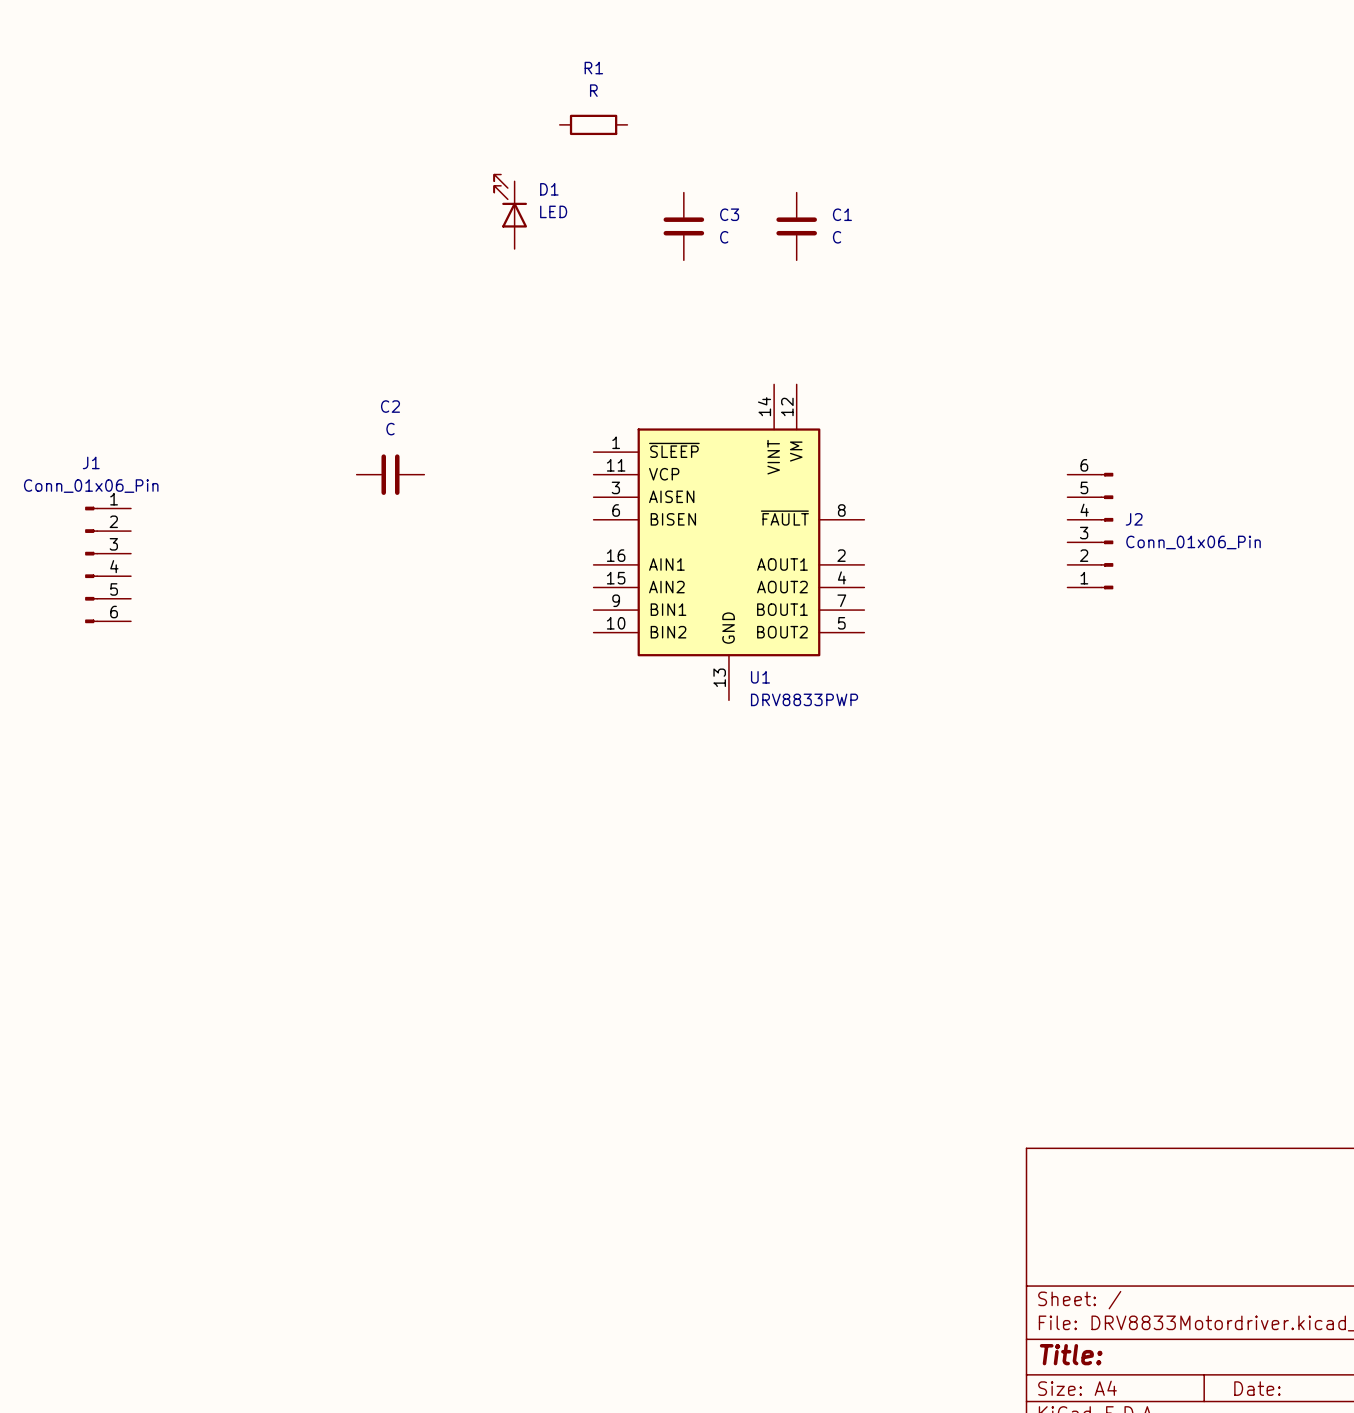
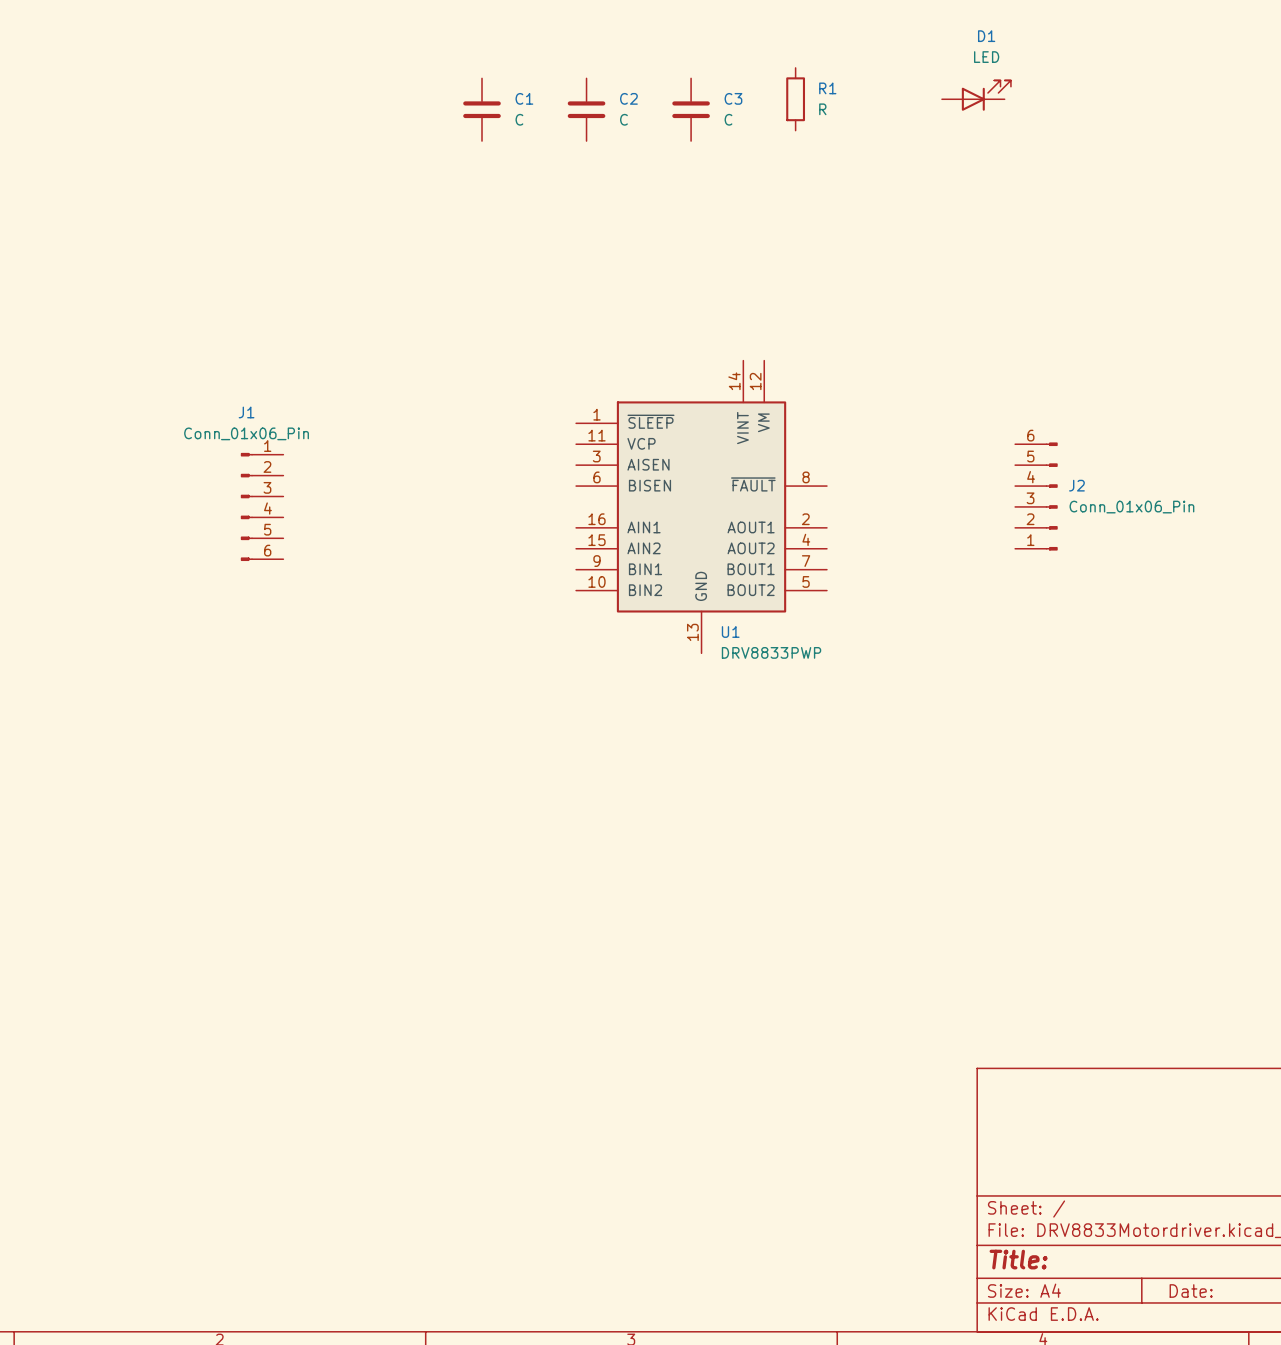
R1 name position: R1 (593, 68) -> R1 (827, 88)
R1 rotation: 0° (593, 124) -> 90° clockwise (795, 99)
R1 position: (593, 124) -> (795, 99)
D1 name position: D1 (549, 189) -> D1 (986, 36)
D1 rotation: 0° (510, 201) -> 90° clockwise (986, 95)
D1 position: (510, 211) -> (976, 95)
D1 value position: LED (553, 211) -> LED (986, 57)
C3 position: (683, 226) -> (691, 109)
C1 position: (796, 226) -> (482, 109)
C2 name position: C2 (390, 406) -> C2 (628, 98)
C2 rotation: 0° (390, 474) -> 90° clockwise (586, 109)
C2 position: (390, 474) -> (586, 109)
J1 position: (108, 564) -> (262, 506)

